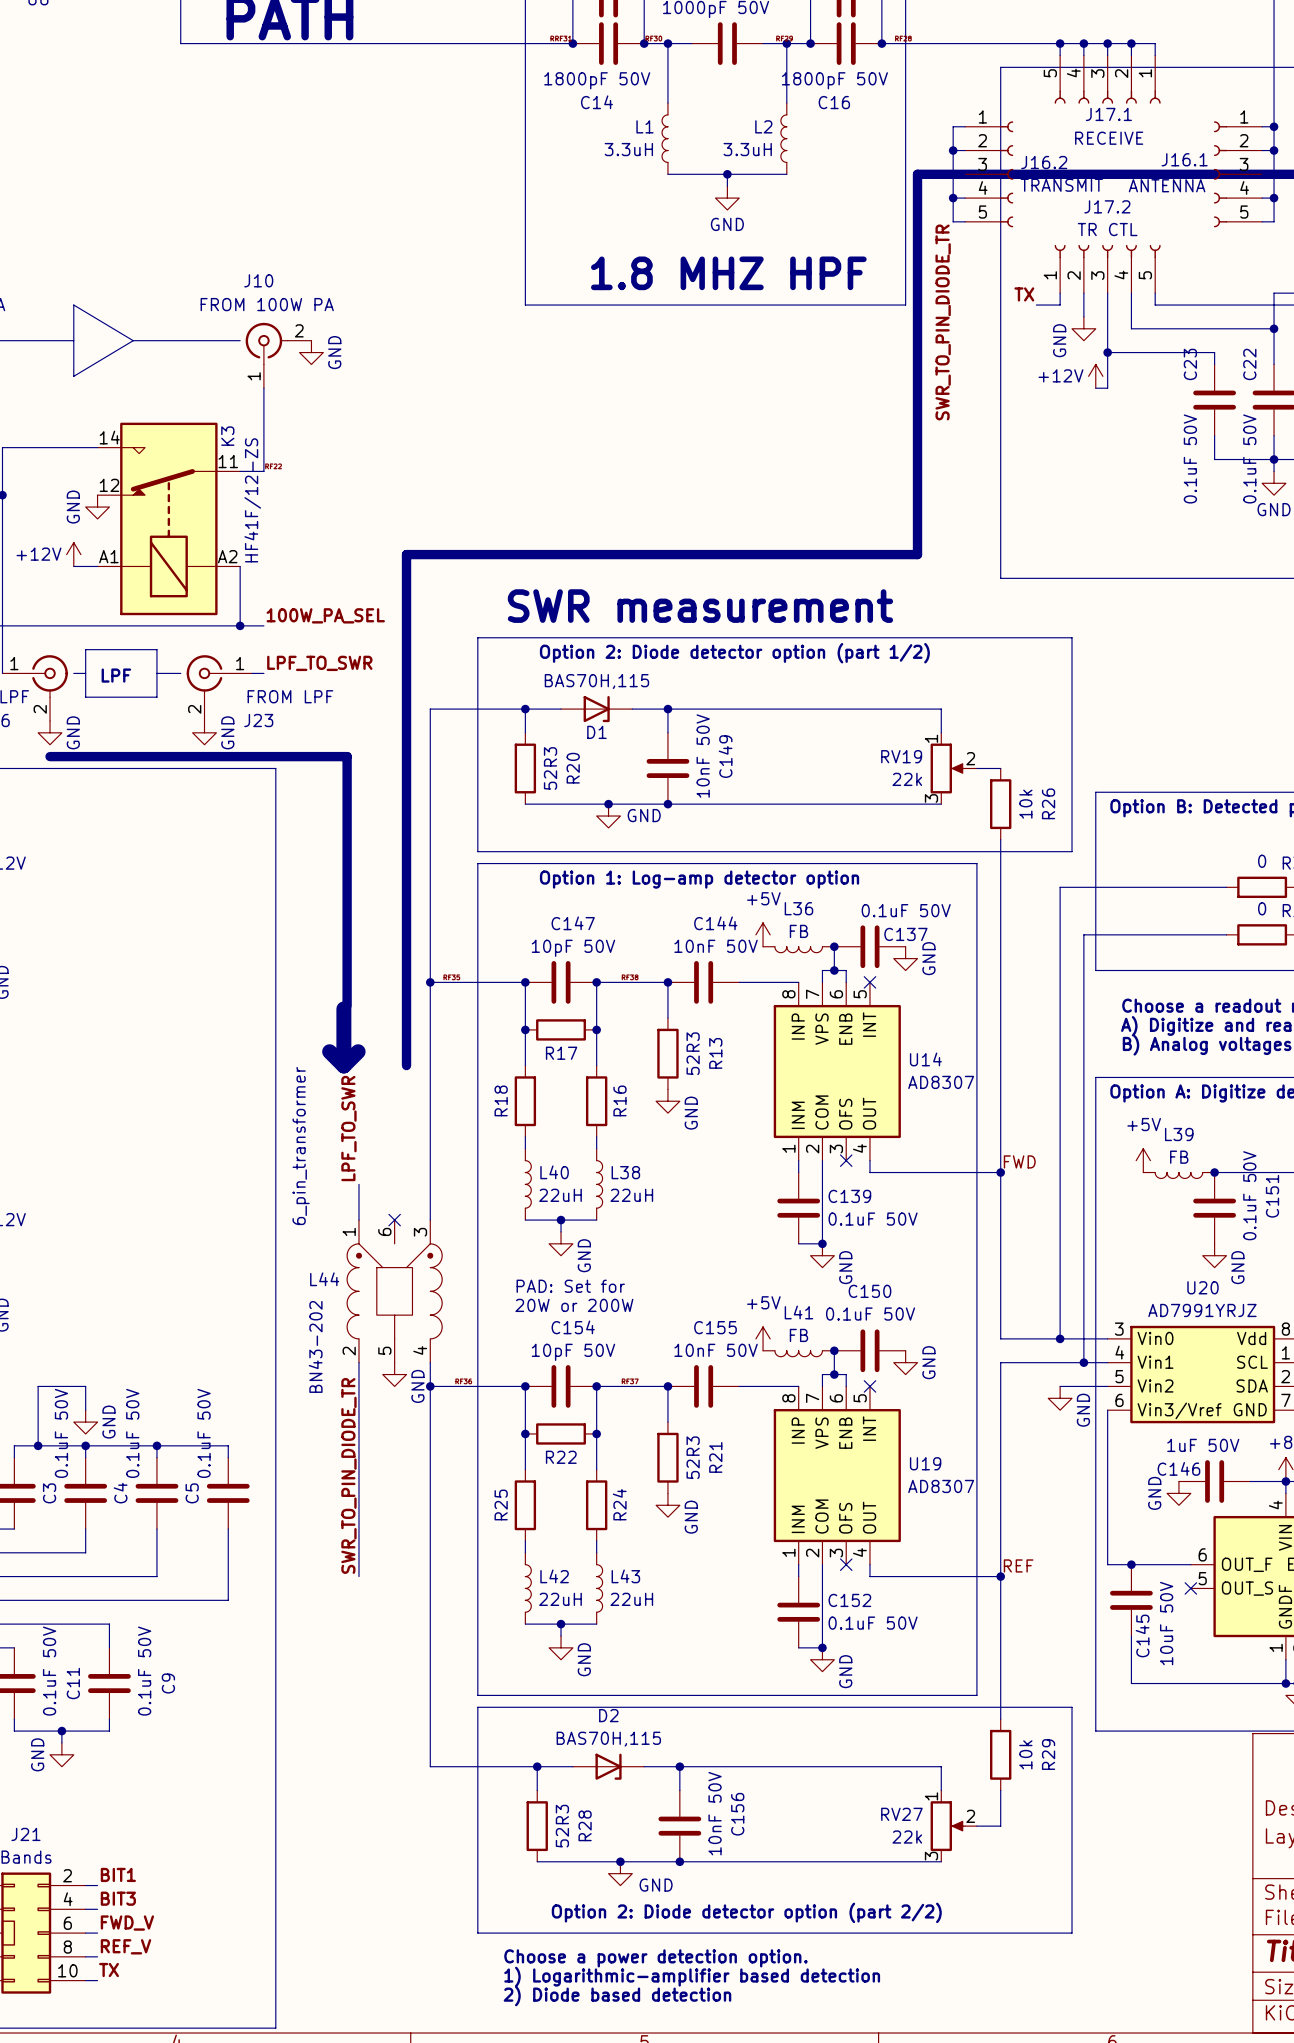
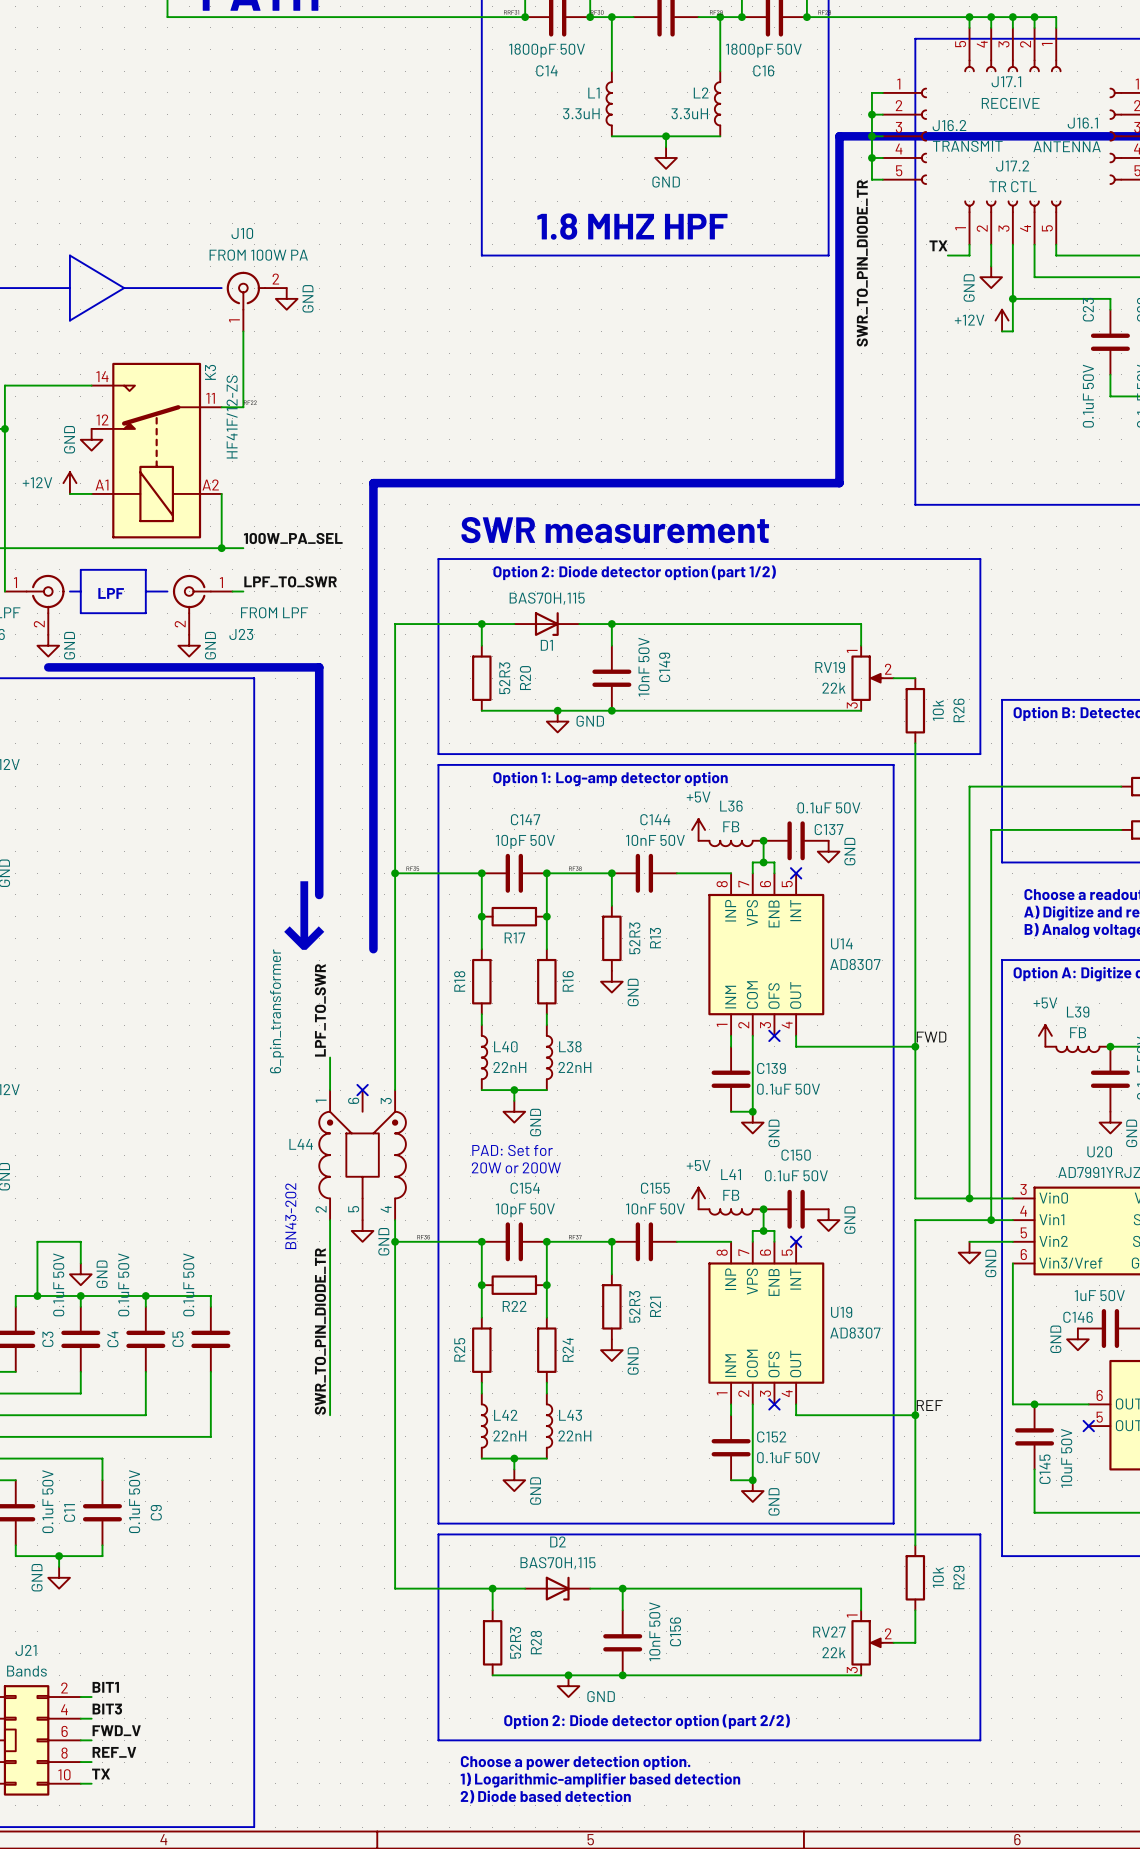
L40 value: 22uH (560, 1195) -> 22nH (509, 1067)
L38 value: 22uH (631, 1195) -> 22nH (574, 1067)
L42 value: 22uH (560, 1599) -> 22nH (509, 1435)
L43 value: 22uH (631, 1599) -> 22nH (574, 1435)

